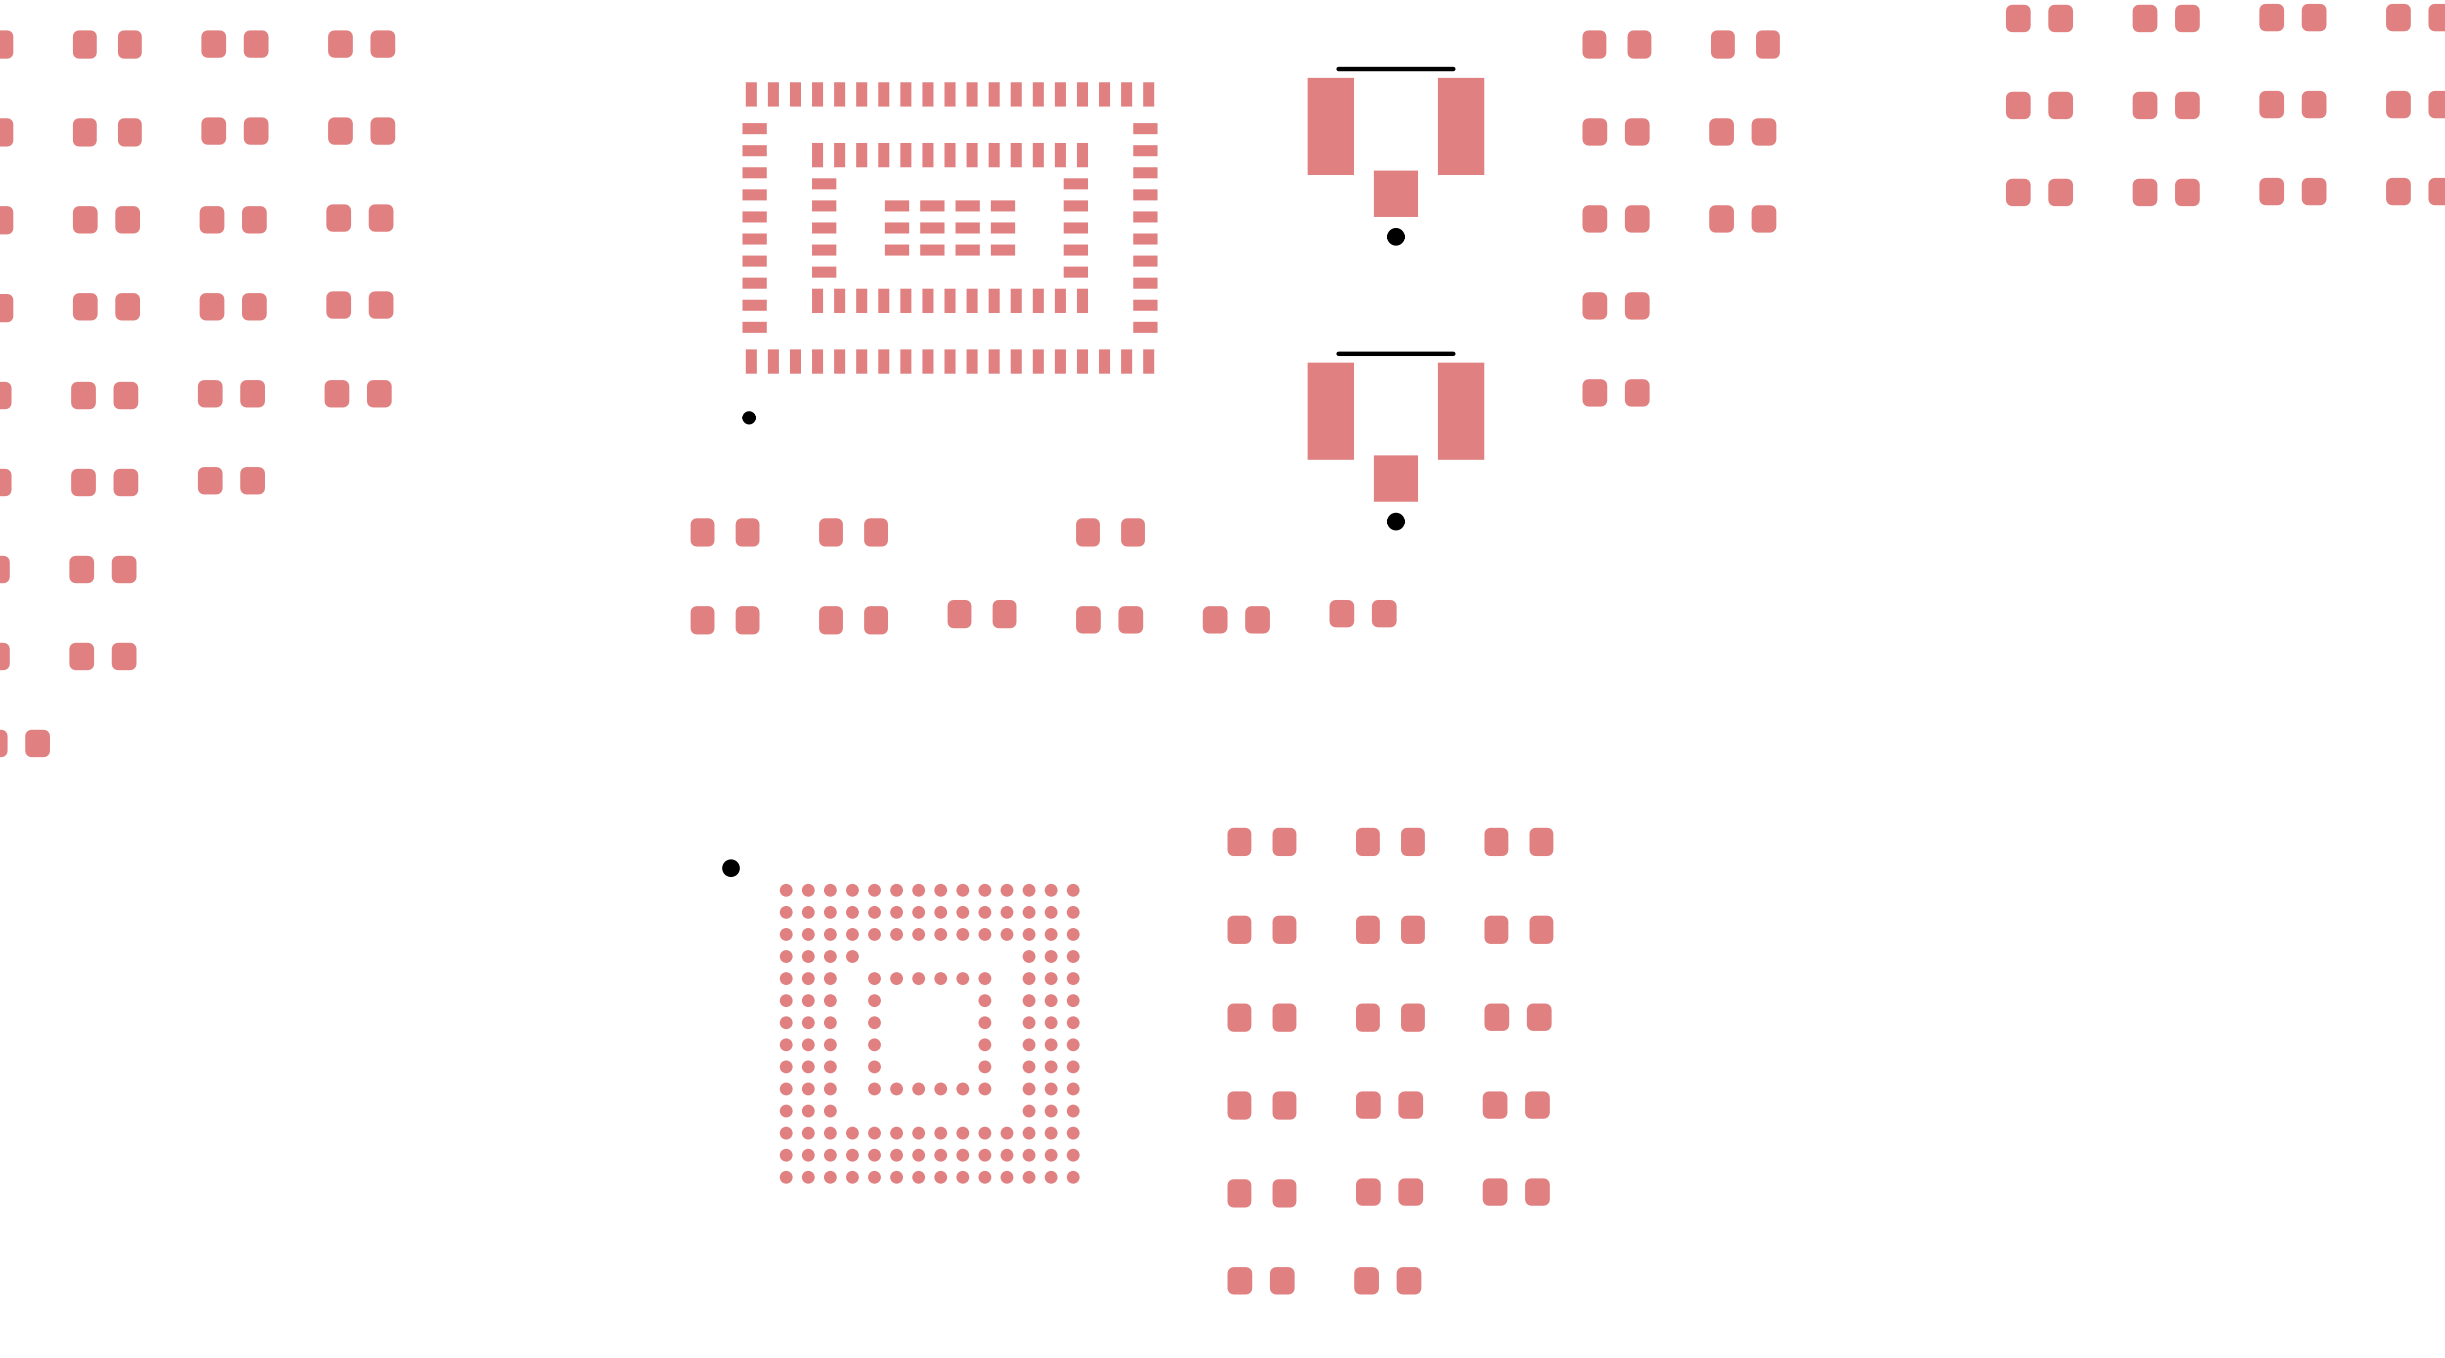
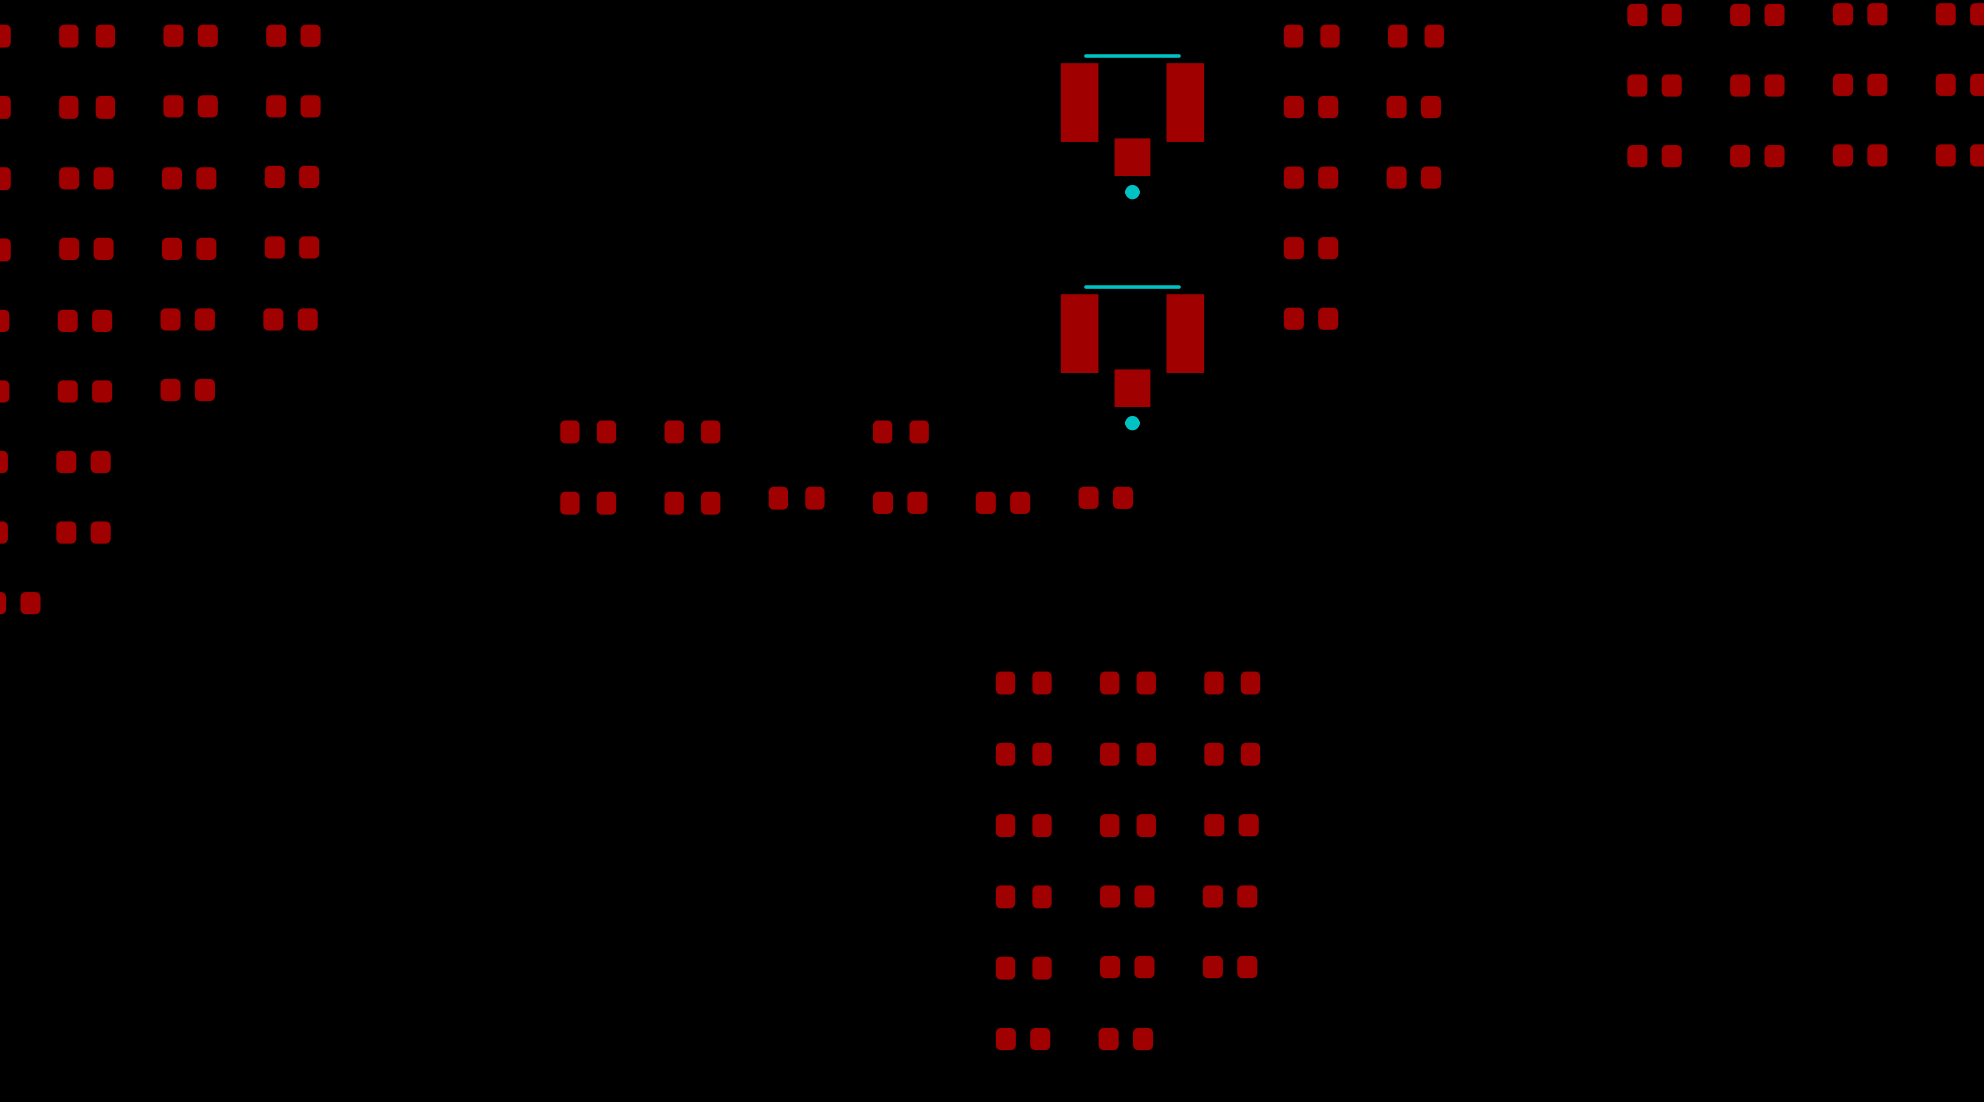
part: (950, 253) -> none
part: (900, 1021) -> none

